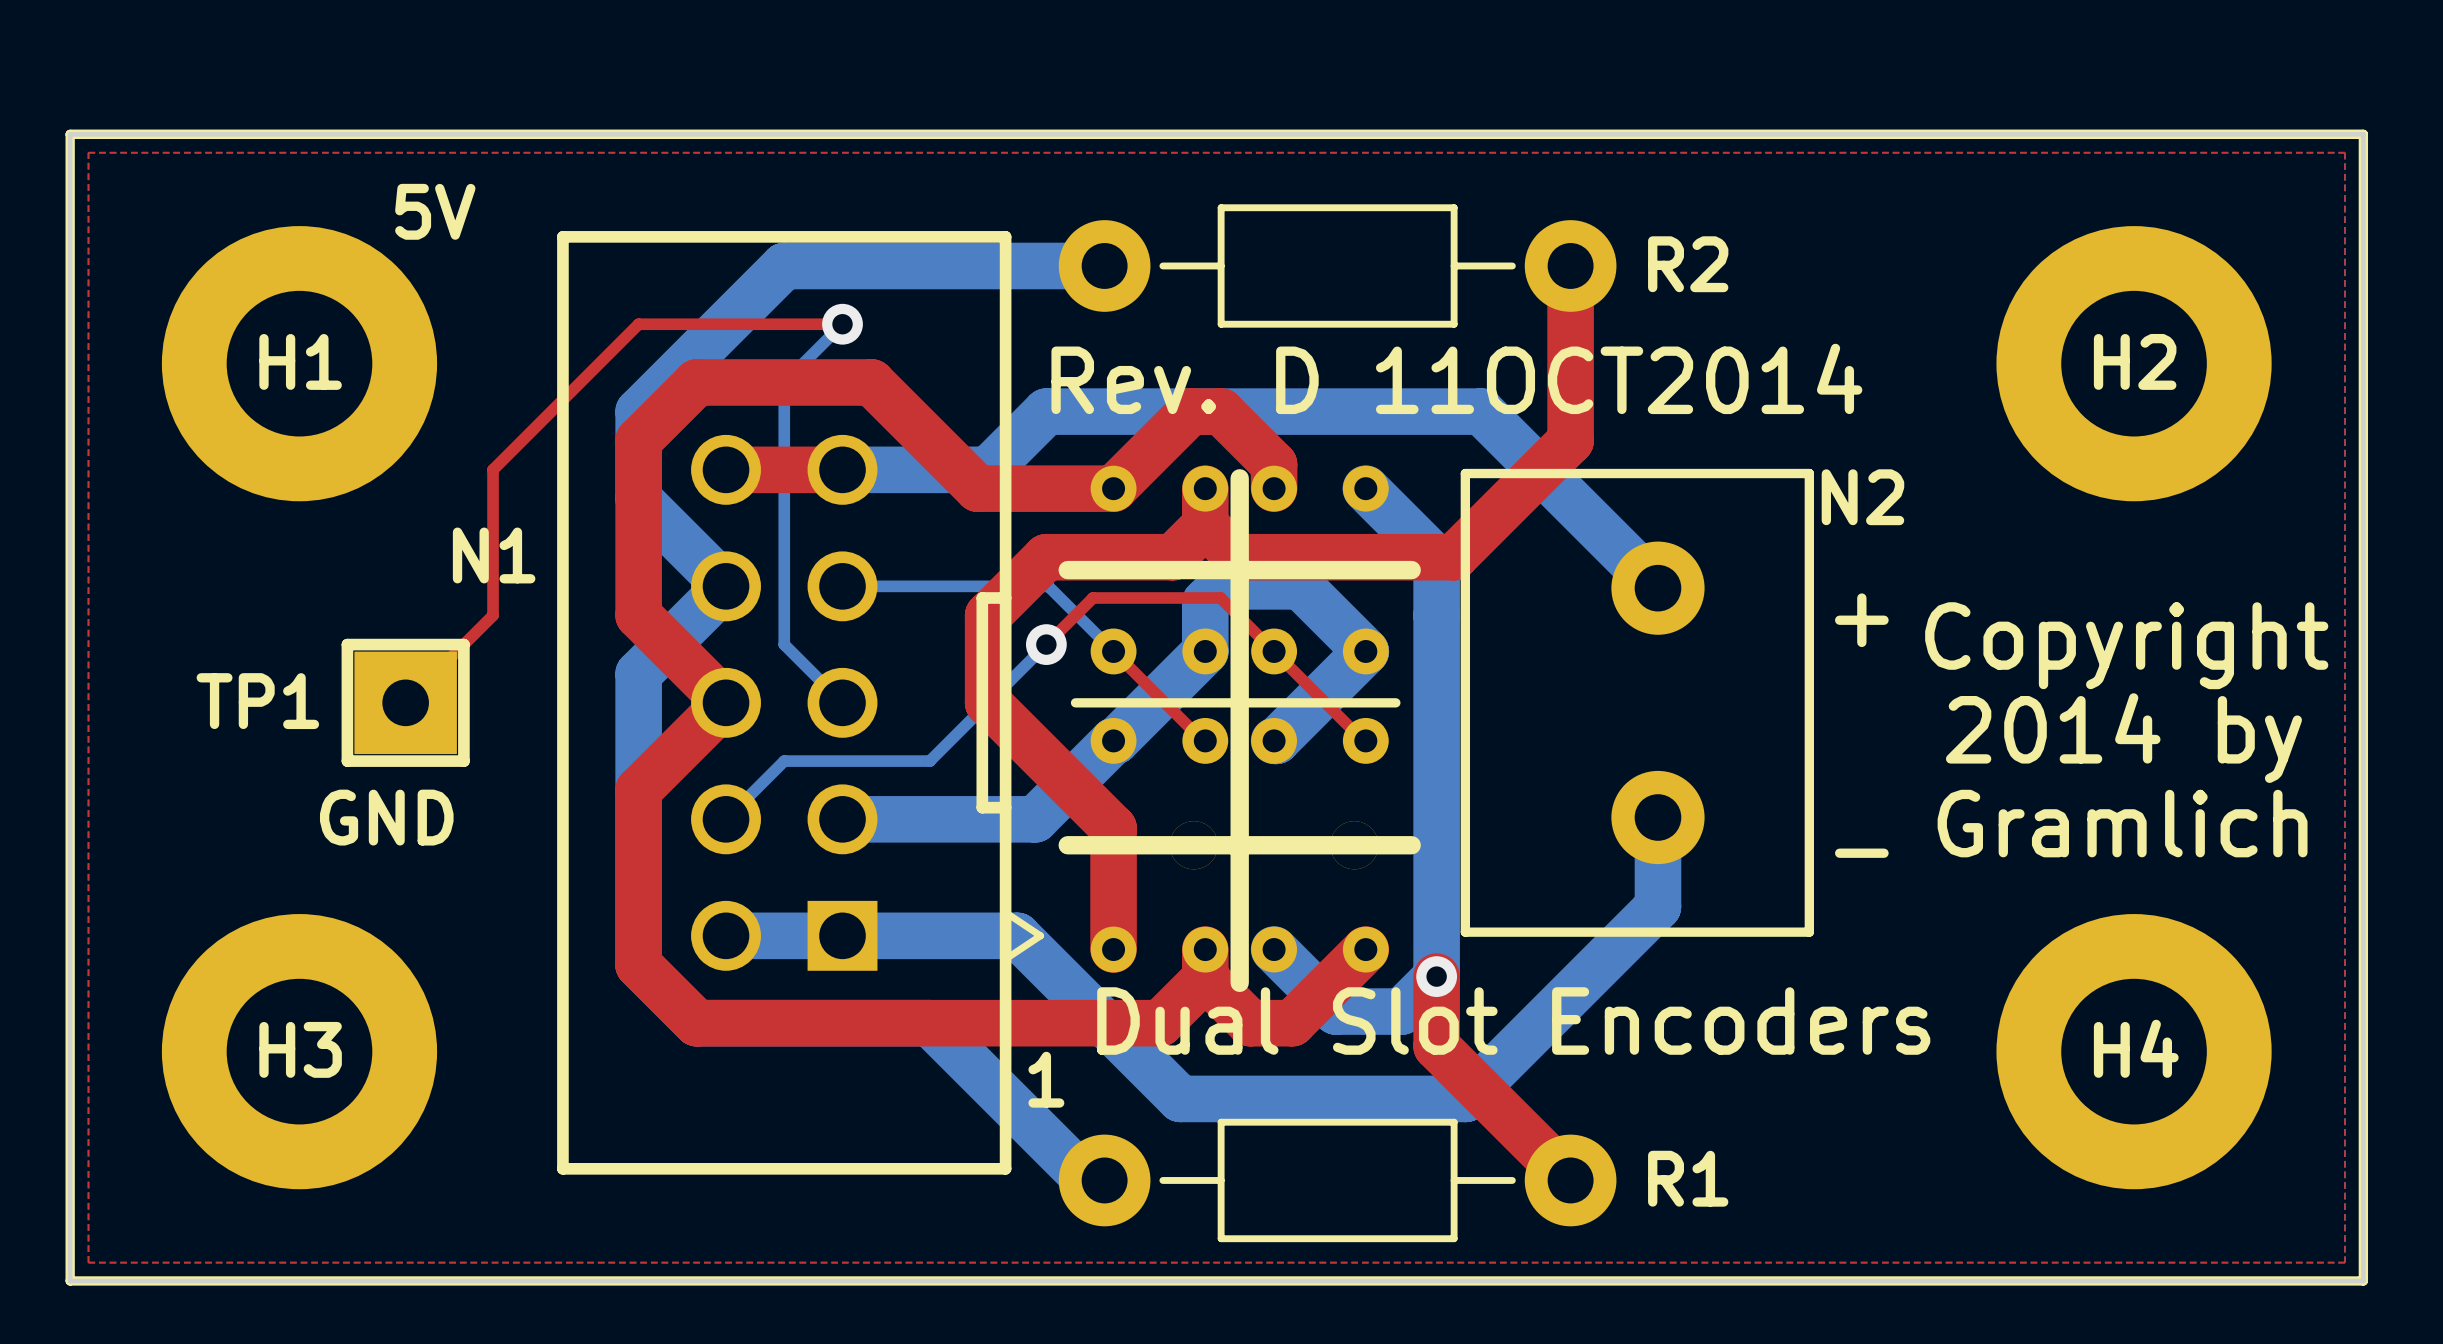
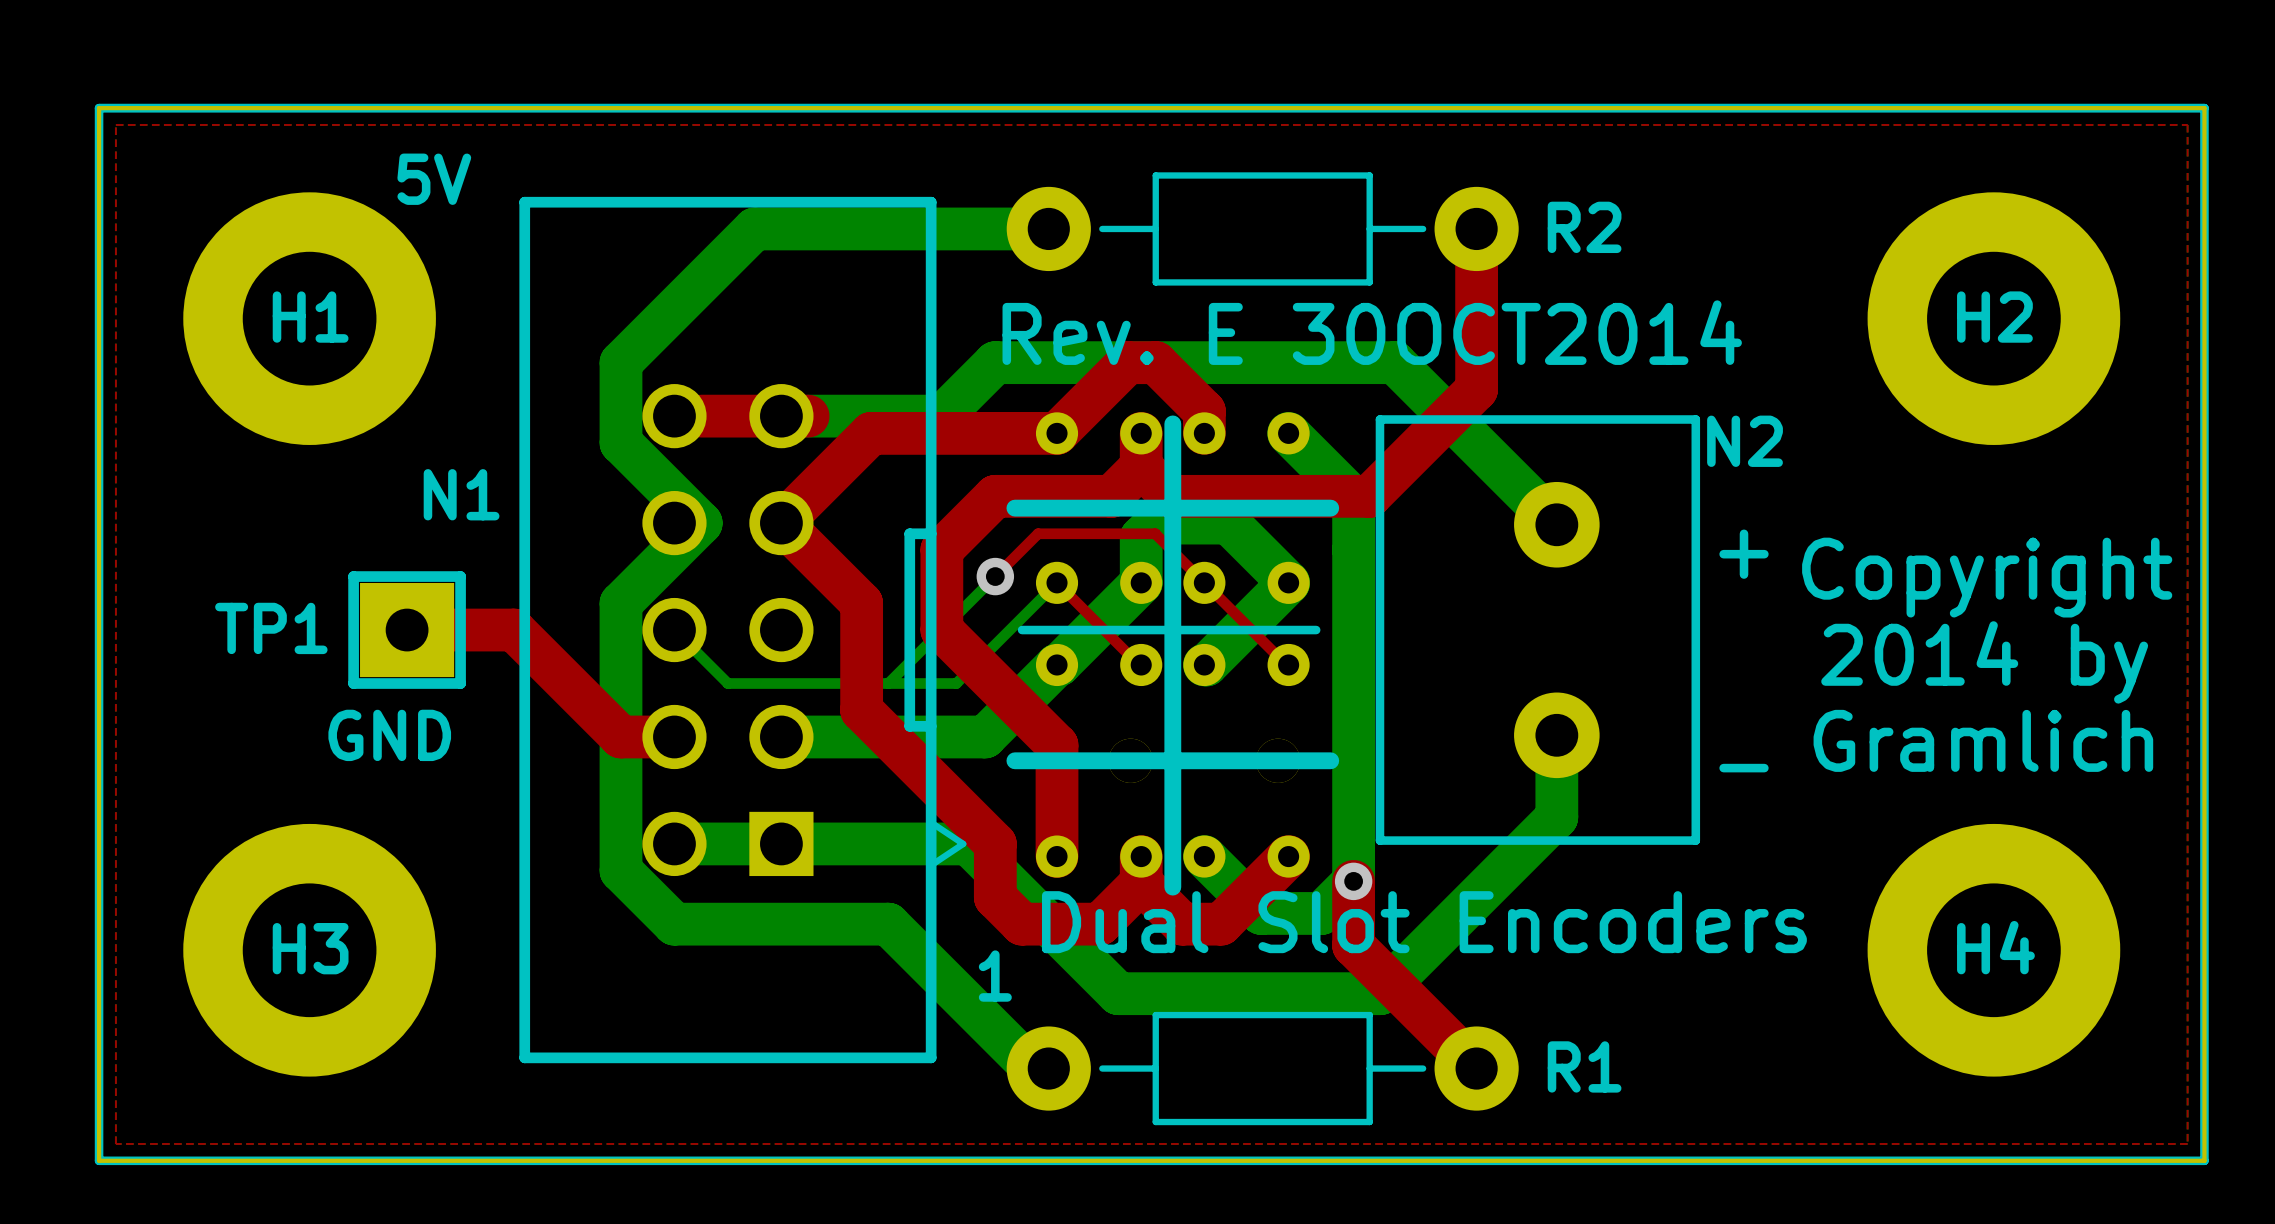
top track: (842, 324) (638, 324) (493, 469) (493, 615) (405, 702) -> (674, 736) (620, 736) (514, 630) (407, 630)
bottom track: (842, 324) (784, 382) (784, 644) (842, 702) -> none
via: (842, 324) -> none
text: Rev. D 11OCT2014 (1456, 378) -> Rev. E 30OCT2014 (1372, 332)
top track: (977, 488) (871, 382) (696, 382) (638, 440) (638, 615) (726, 702) (638, 790) (638, 964) (696, 1023) (1075, 1023) -> (932, 433) (871, 433) (781, 523) (861, 603) (861, 710) (995, 843) (995, 897) (1022, 924)
bottom track: (842, 586) (1048, 586) (1113, 651) -> (888, 683) (956, 683) (1057, 582)
N1 position: (800, 702) -> (742, 630)
bottom track: (784, 761) (726, 819) -> (754, 683) (727, 683) (674, 630)

